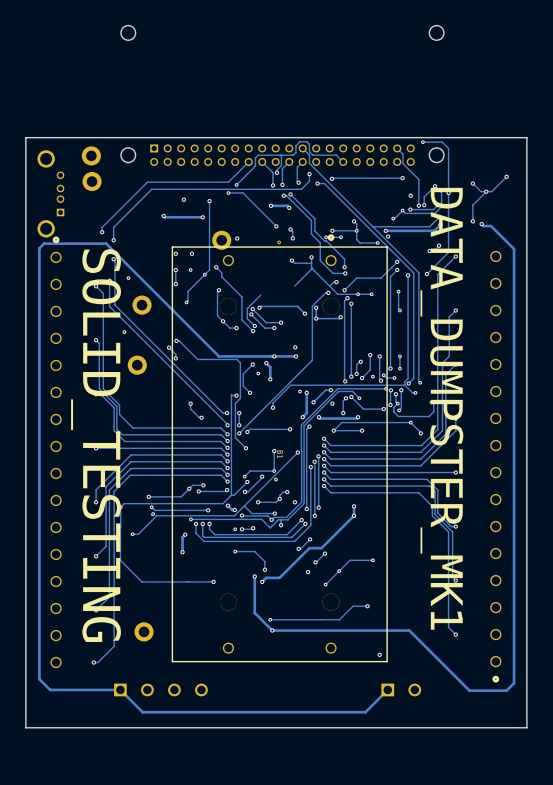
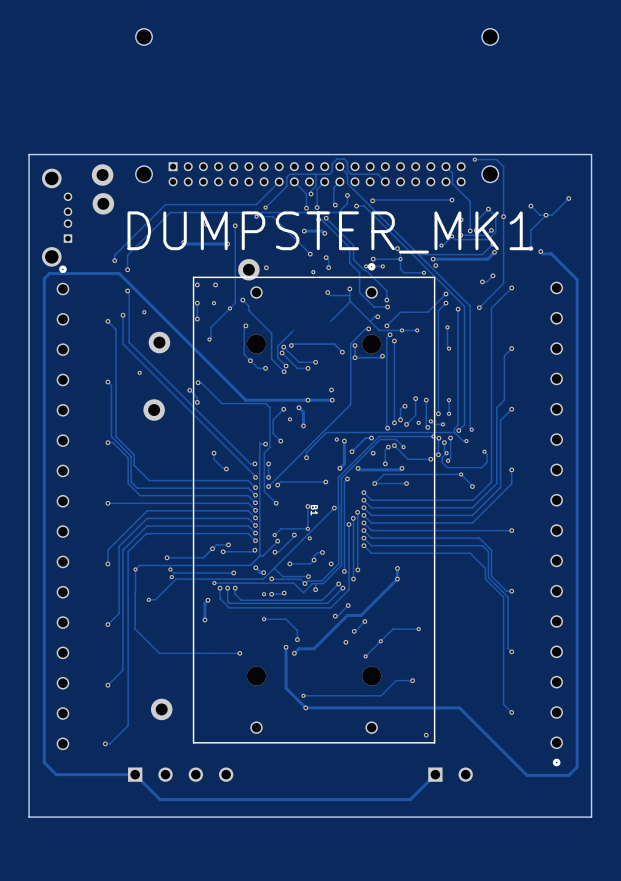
text: none -> DUMPSTER_MK1 (330, 232)
text: DATA_DUMPSTER_MK1 (441, 408) -> none
text: SOLID_TESTING (96, 445) -> none

